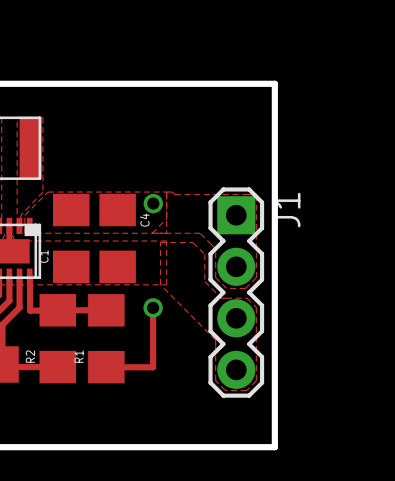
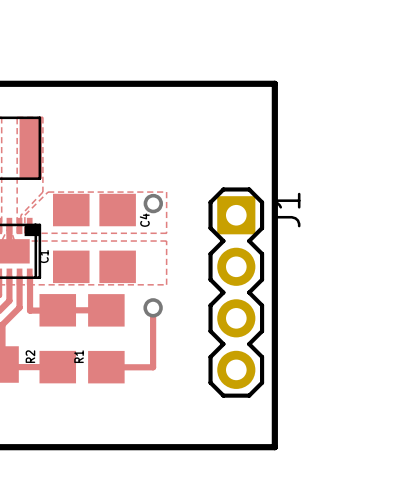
zone outline: (166, 192) (172, 192) (174, 194) (256, 194) (256, 277) (245, 288) (226, 288) (215, 277) (215, 248) (200, 233) (166, 233) -> none
zone outline: (166, 218) (152, 233) -> none
zone outline: (160, 242) (160, 284) (215, 339) (215, 380) (225, 390) (246, 390) (256, 380) (256, 307) (247, 298) (221, 298) (204, 281) (204, 254) (192, 242) (160, 242) -> none

